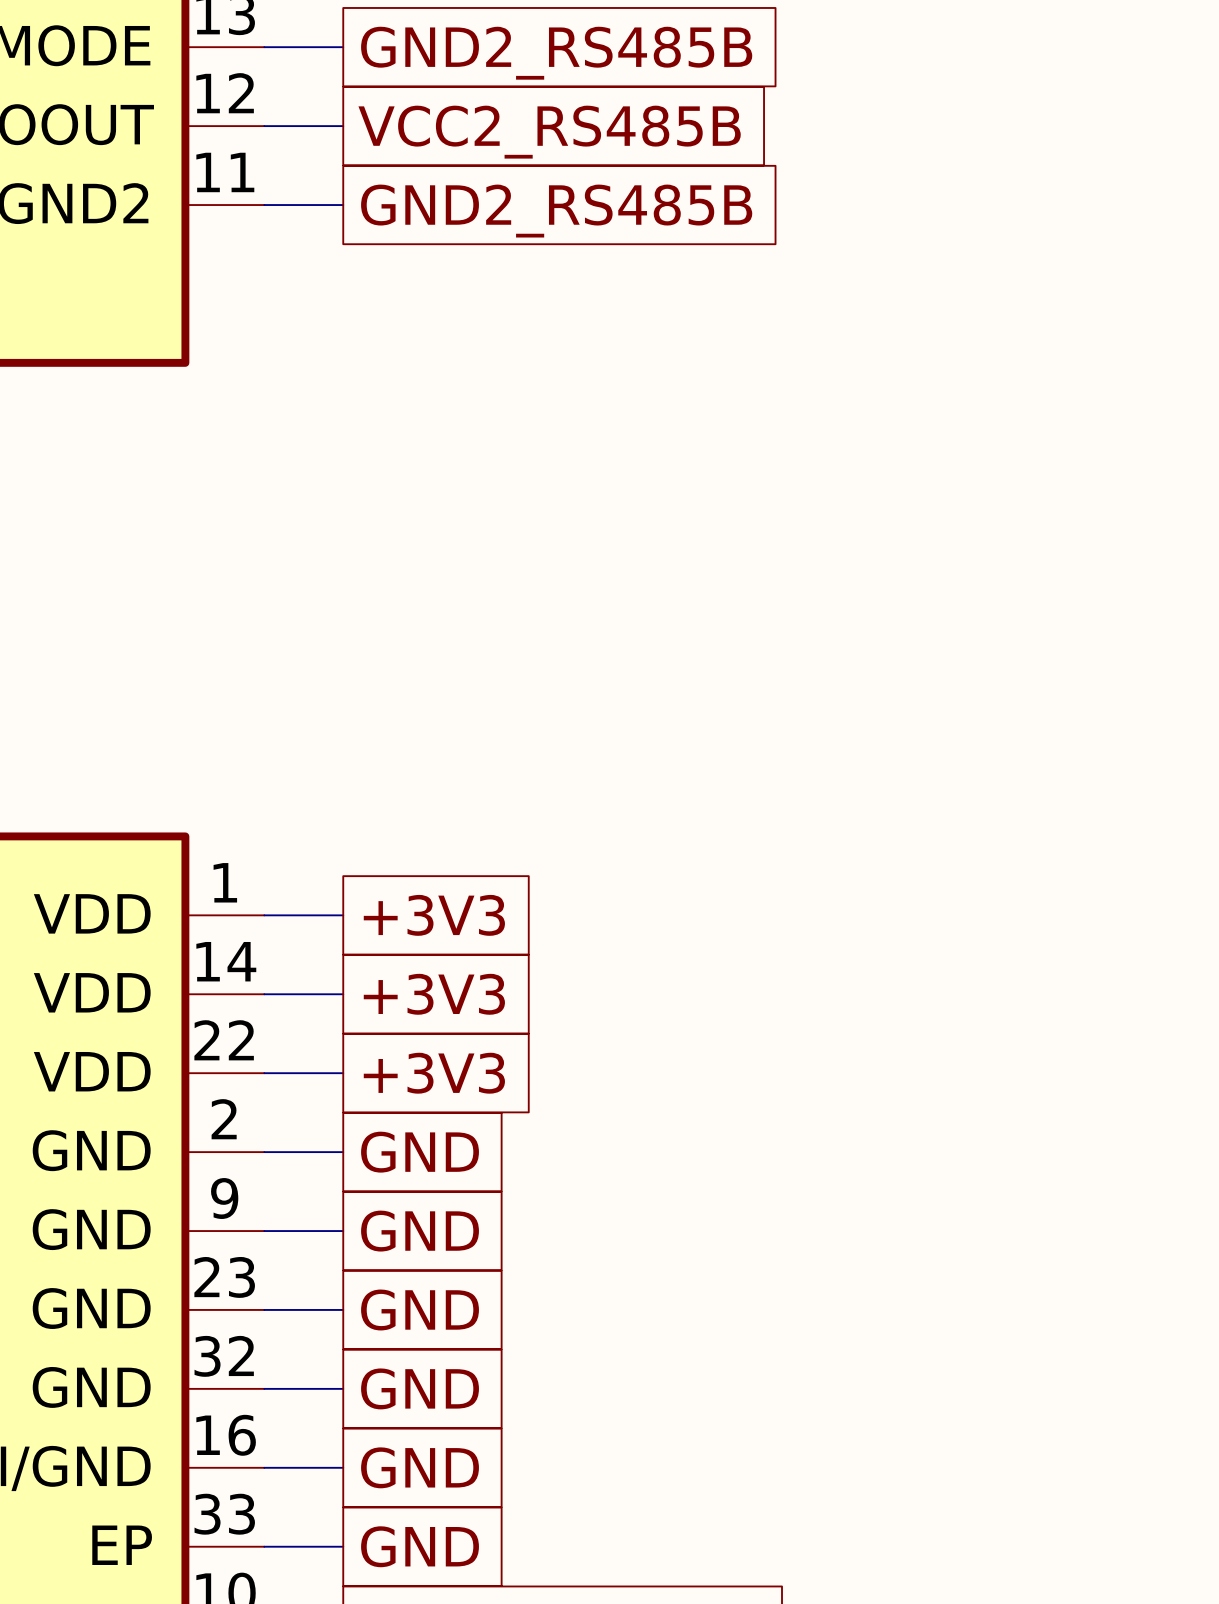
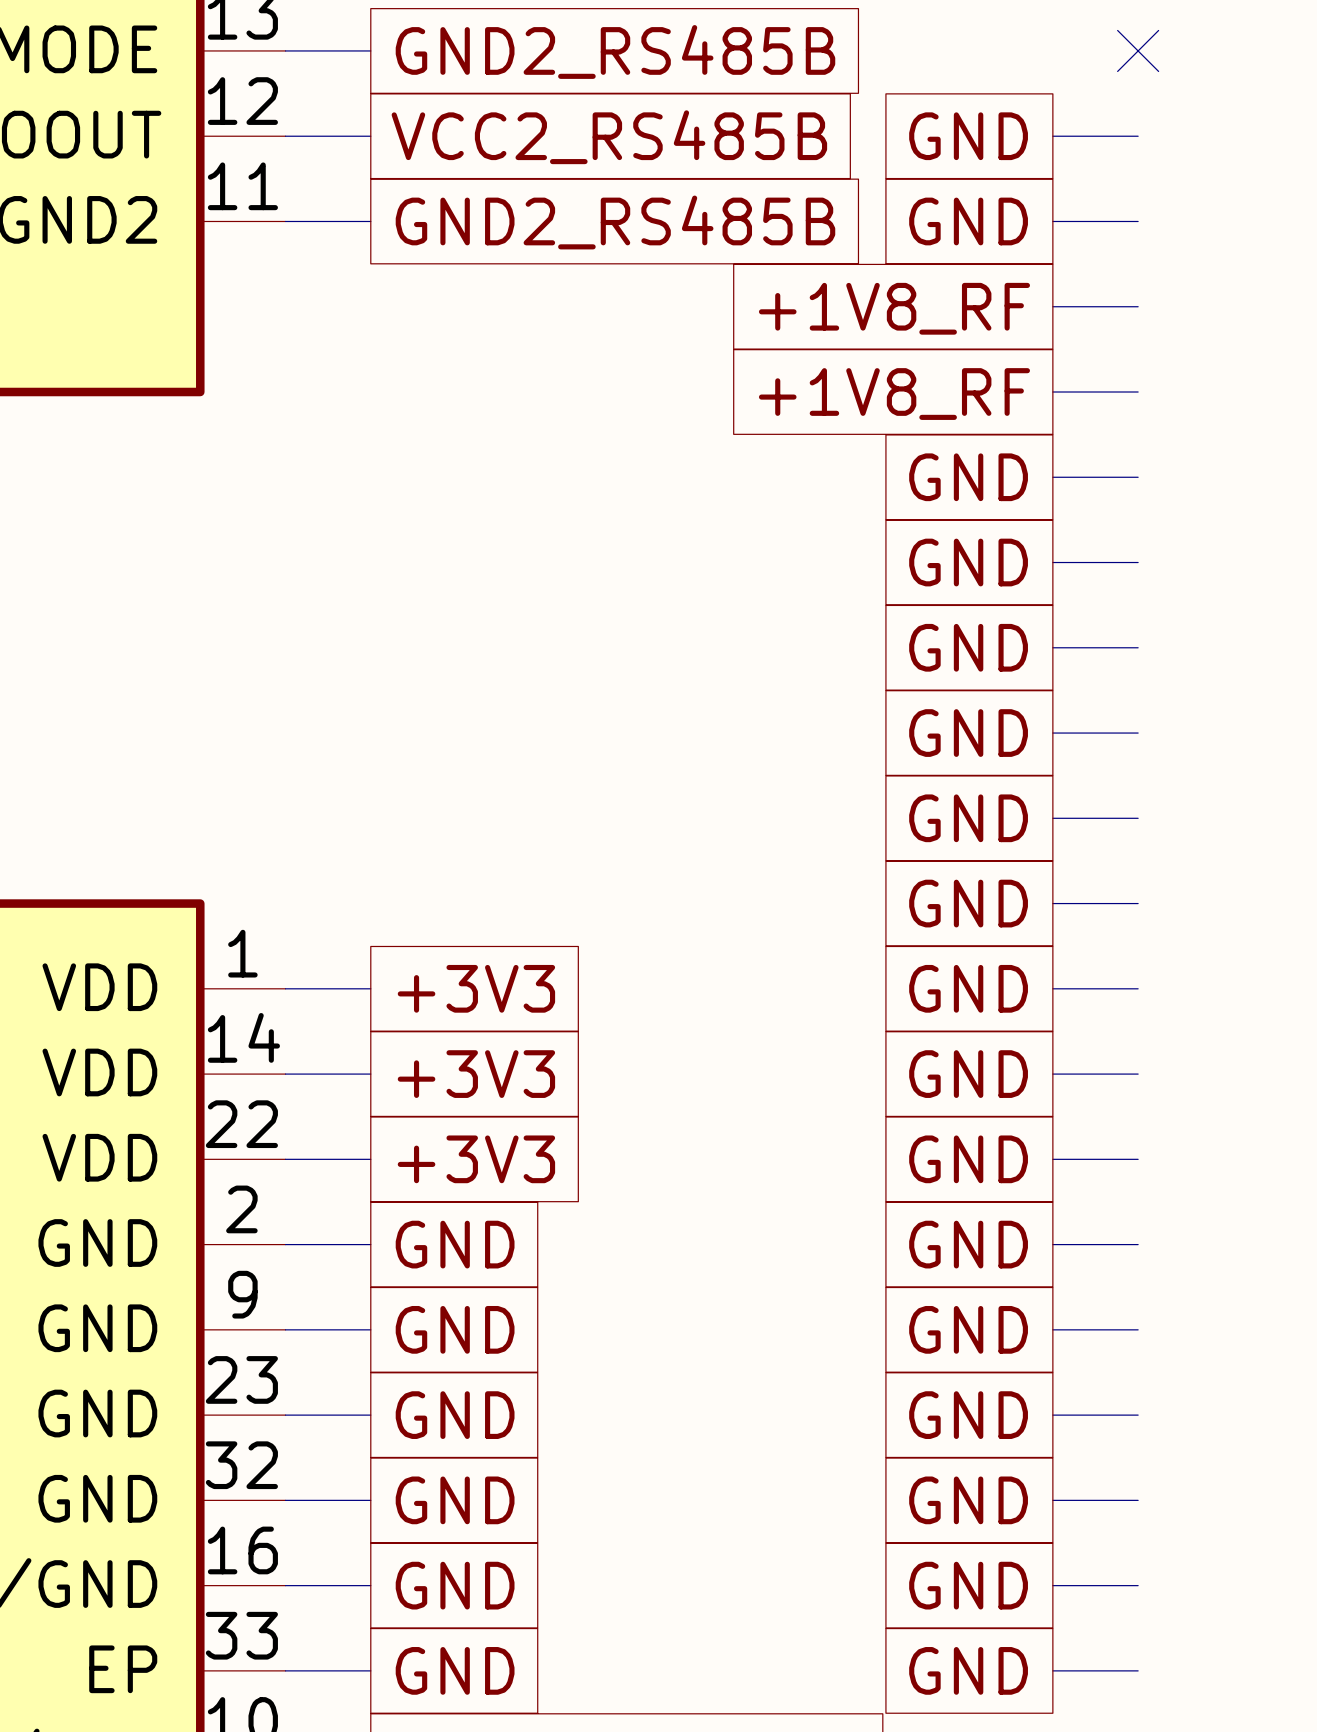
no-connect mark: none -> (1138, 50)
global label: none -> GND (968, 136)
wire: none -> (1052, 136) (1138, 136)
global label: none -> GND (968, 221)
wire: none -> (1052, 221) (1138, 221)
wire: none -> (1052, 306) (1138, 306)
global label: none -> +1V8_RF (894, 308)
wire: none -> (1052, 392) (1138, 392)
global label: none -> +1V8_RF (894, 394)
global label: none -> GND (968, 477)
wire: none -> (1052, 477) (1138, 477)
global label: none -> GND (968, 562)
wire: none -> (1052, 562) (1138, 562)
global label: none -> GND (968, 647)
wire: none -> (1052, 647) (1138, 647)
global label: none -> GND (968, 733)
wire: none -> (1052, 733) (1138, 733)
global label: none -> GND (968, 818)
wire: none -> (1052, 818) (1138, 818)
global label: none -> GND (968, 903)
wire: none -> (1052, 903) (1138, 903)
global label: none -> GND (968, 988)
wire: none -> (1052, 988) (1138, 988)
global label: none -> GND (968, 1074)
wire: none -> (1052, 1074) (1138, 1074)
global label: none -> GND (968, 1159)
wire: none -> (1052, 1159) (1138, 1159)
global label: none -> GND (968, 1244)
wire: none -> (1052, 1244) (1138, 1244)
global label: none -> GND (968, 1329)
wire: none -> (1052, 1329) (1138, 1329)
global label: none -> GND (968, 1415)
wire: none -> (1052, 1415) (1138, 1415)
global label: none -> GND (968, 1500)
wire: none -> (1052, 1500) (1138, 1500)
global label: none -> GND (968, 1585)
wire: none -> (1052, 1585) (1138, 1585)
global label: none -> GND (968, 1670)
wire: none -> (1052, 1670) (1138, 1670)

